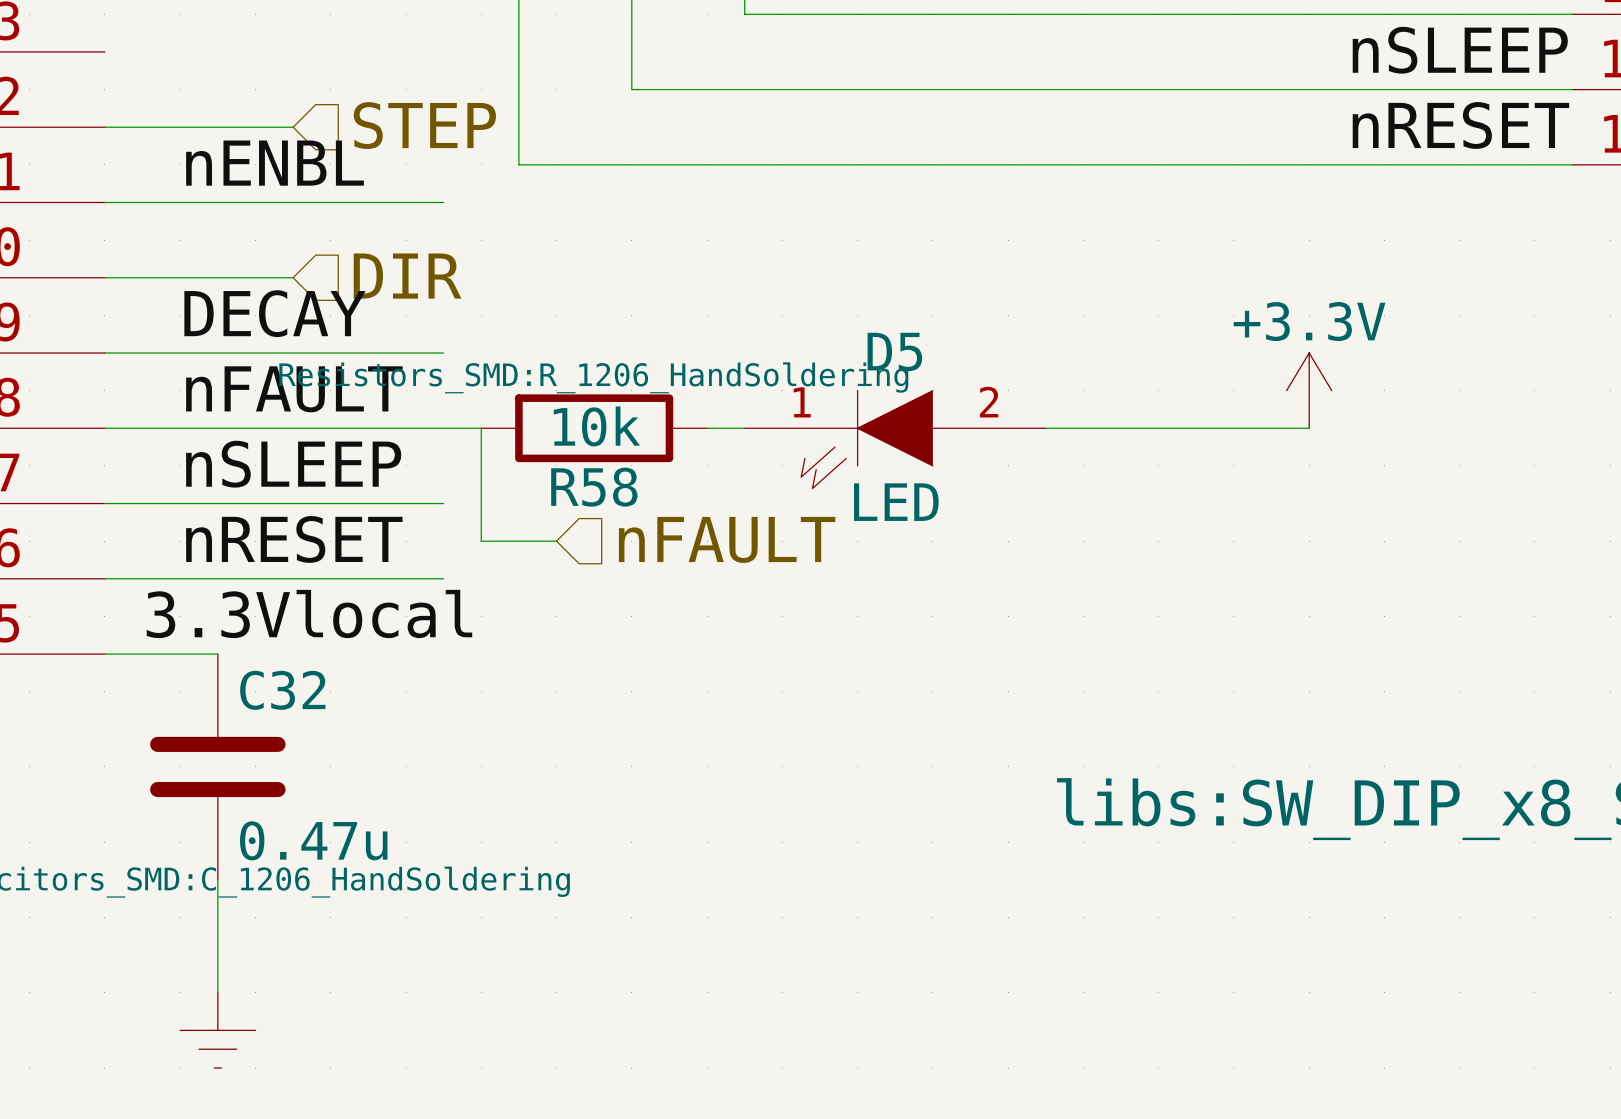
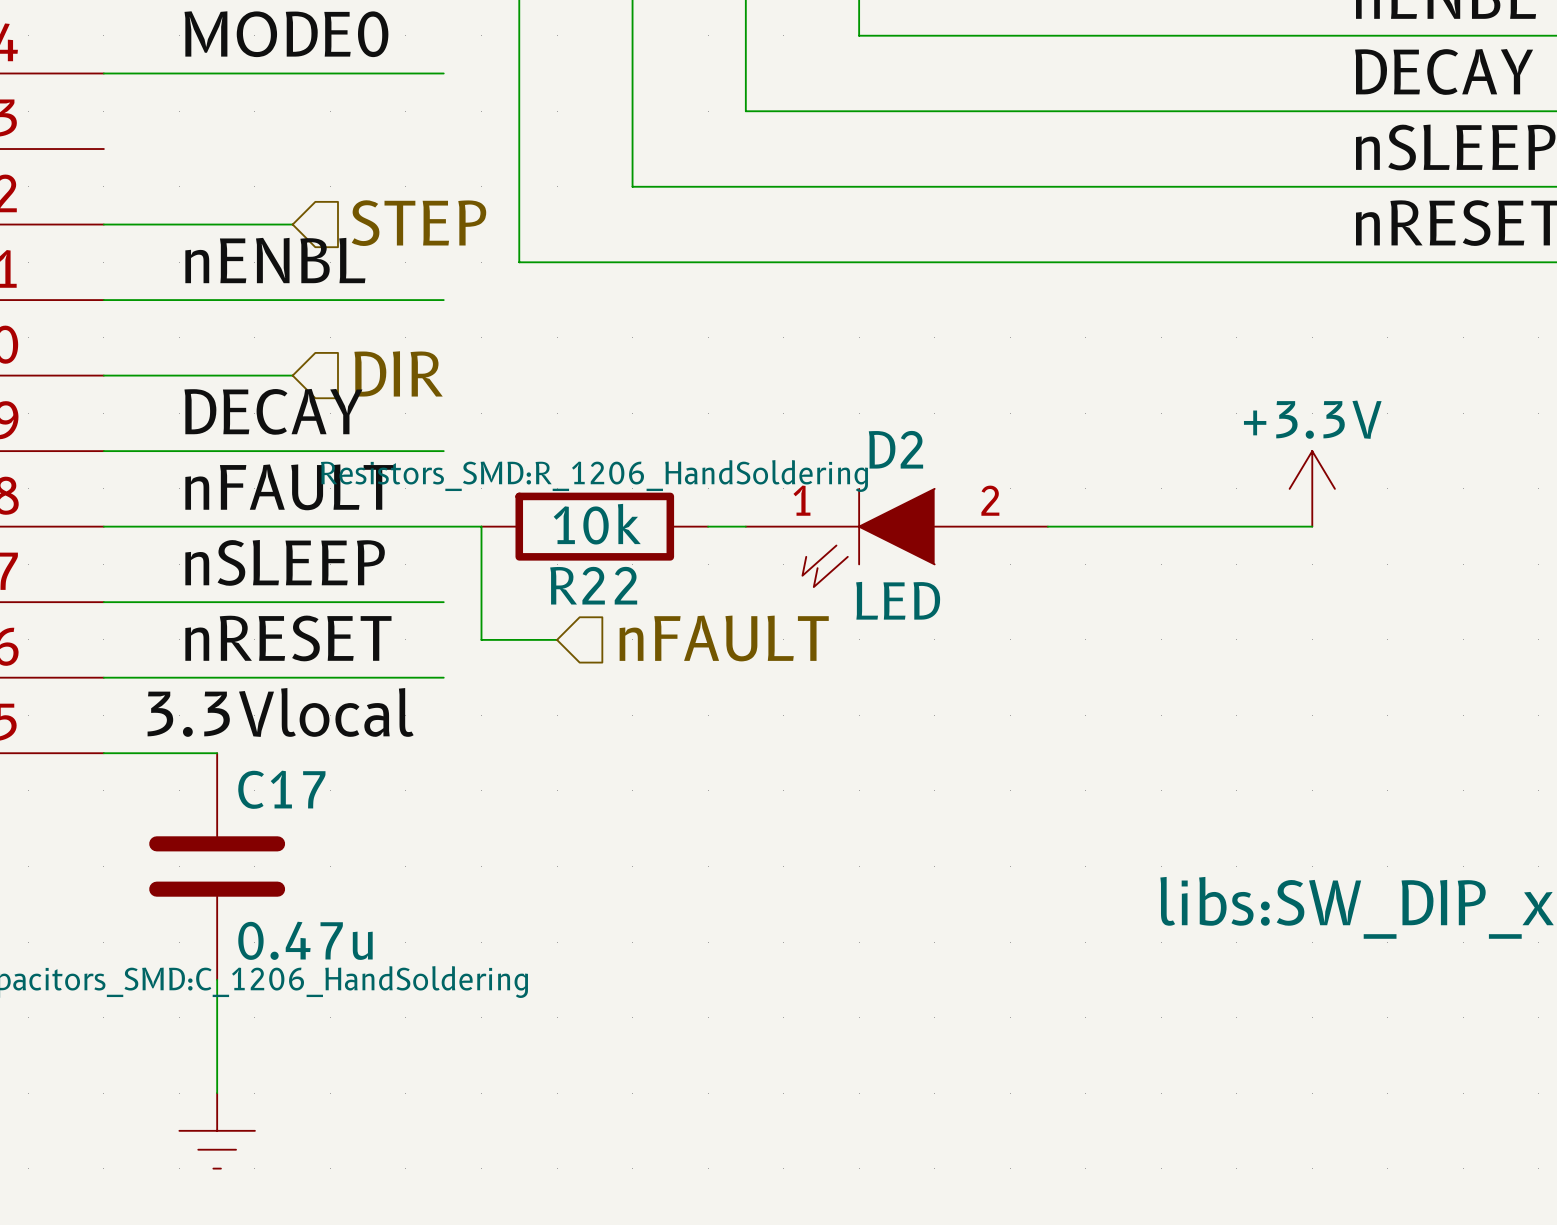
D5 name: D5 (894, 351) -> D2 (895, 449)
R58 name: R58 (594, 487) -> R22 (593, 585)
C32 name: C32 (282, 690) -> C17 (281, 789)

